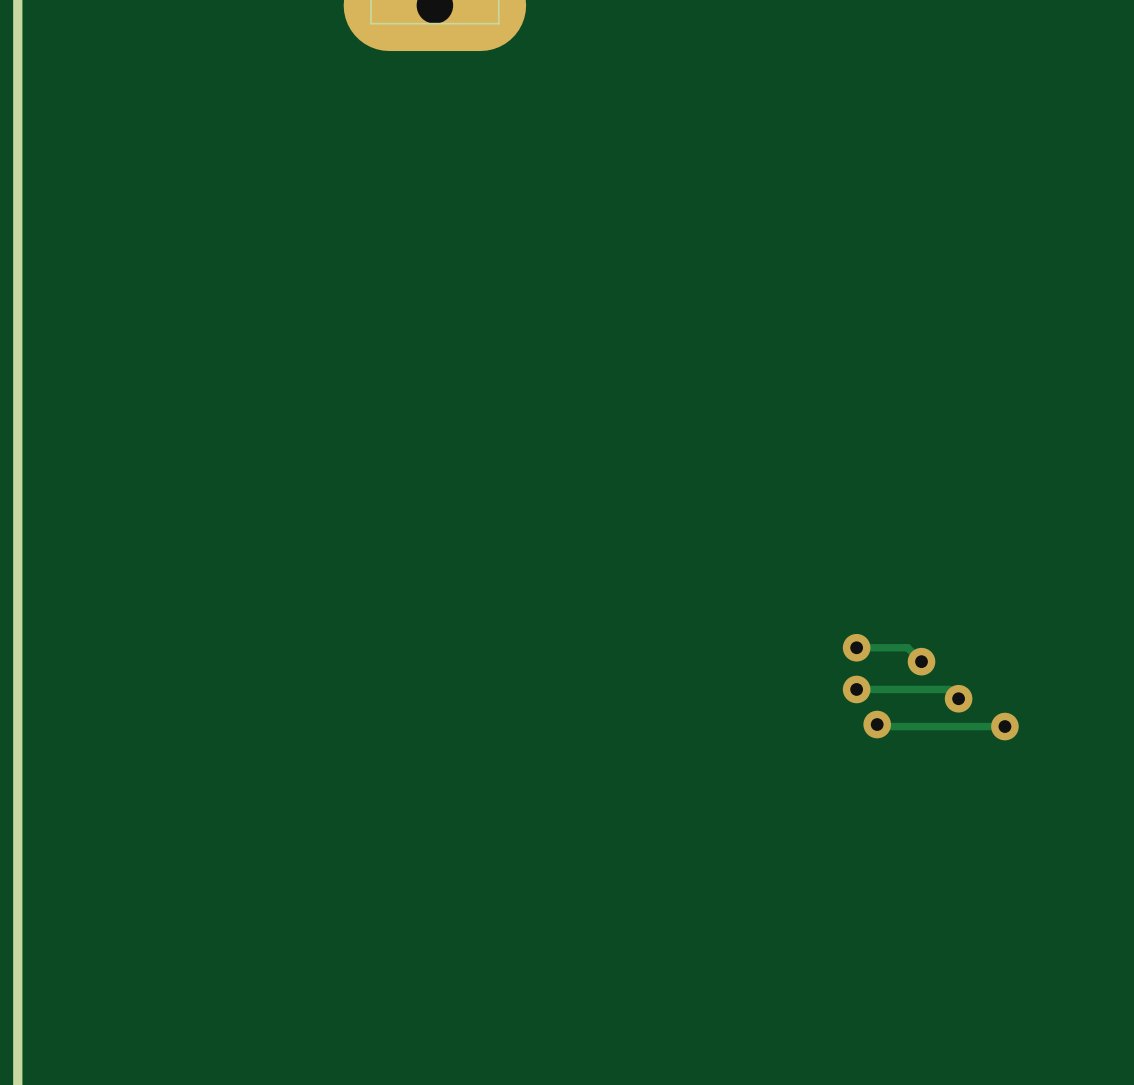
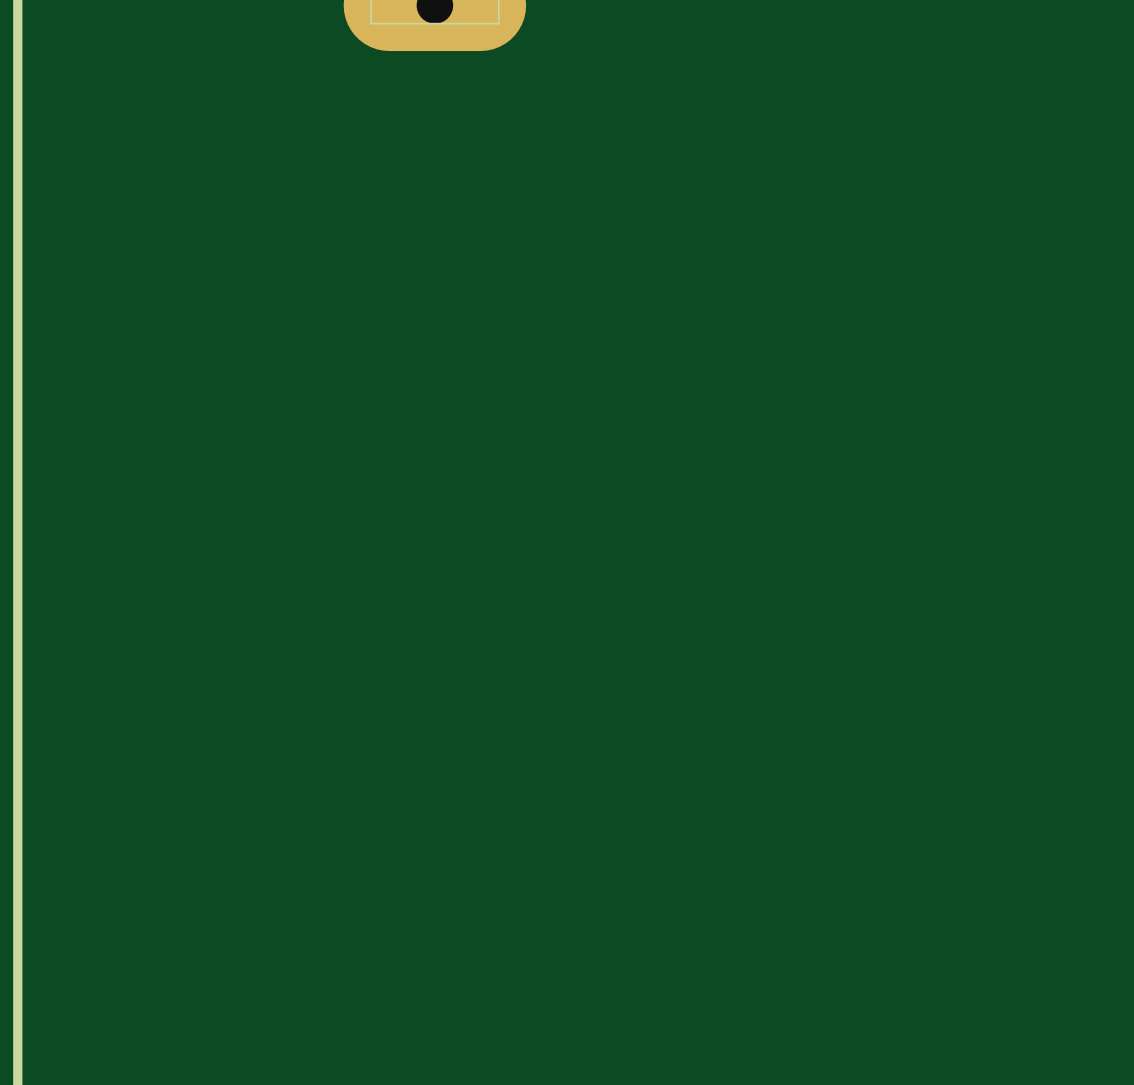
track: (856, 647) (907, 647) (921, 661) -> none
via: (856, 647) -> none
via: (921, 661) -> none
track: (856, 689) (949, 689) (958, 698) -> none
via: (856, 689) -> none
via: (958, 698) -> none
track: (877, 724) (879, 726) (1004, 726) -> none
via: (877, 724) -> none
via: (1004, 726) -> none

